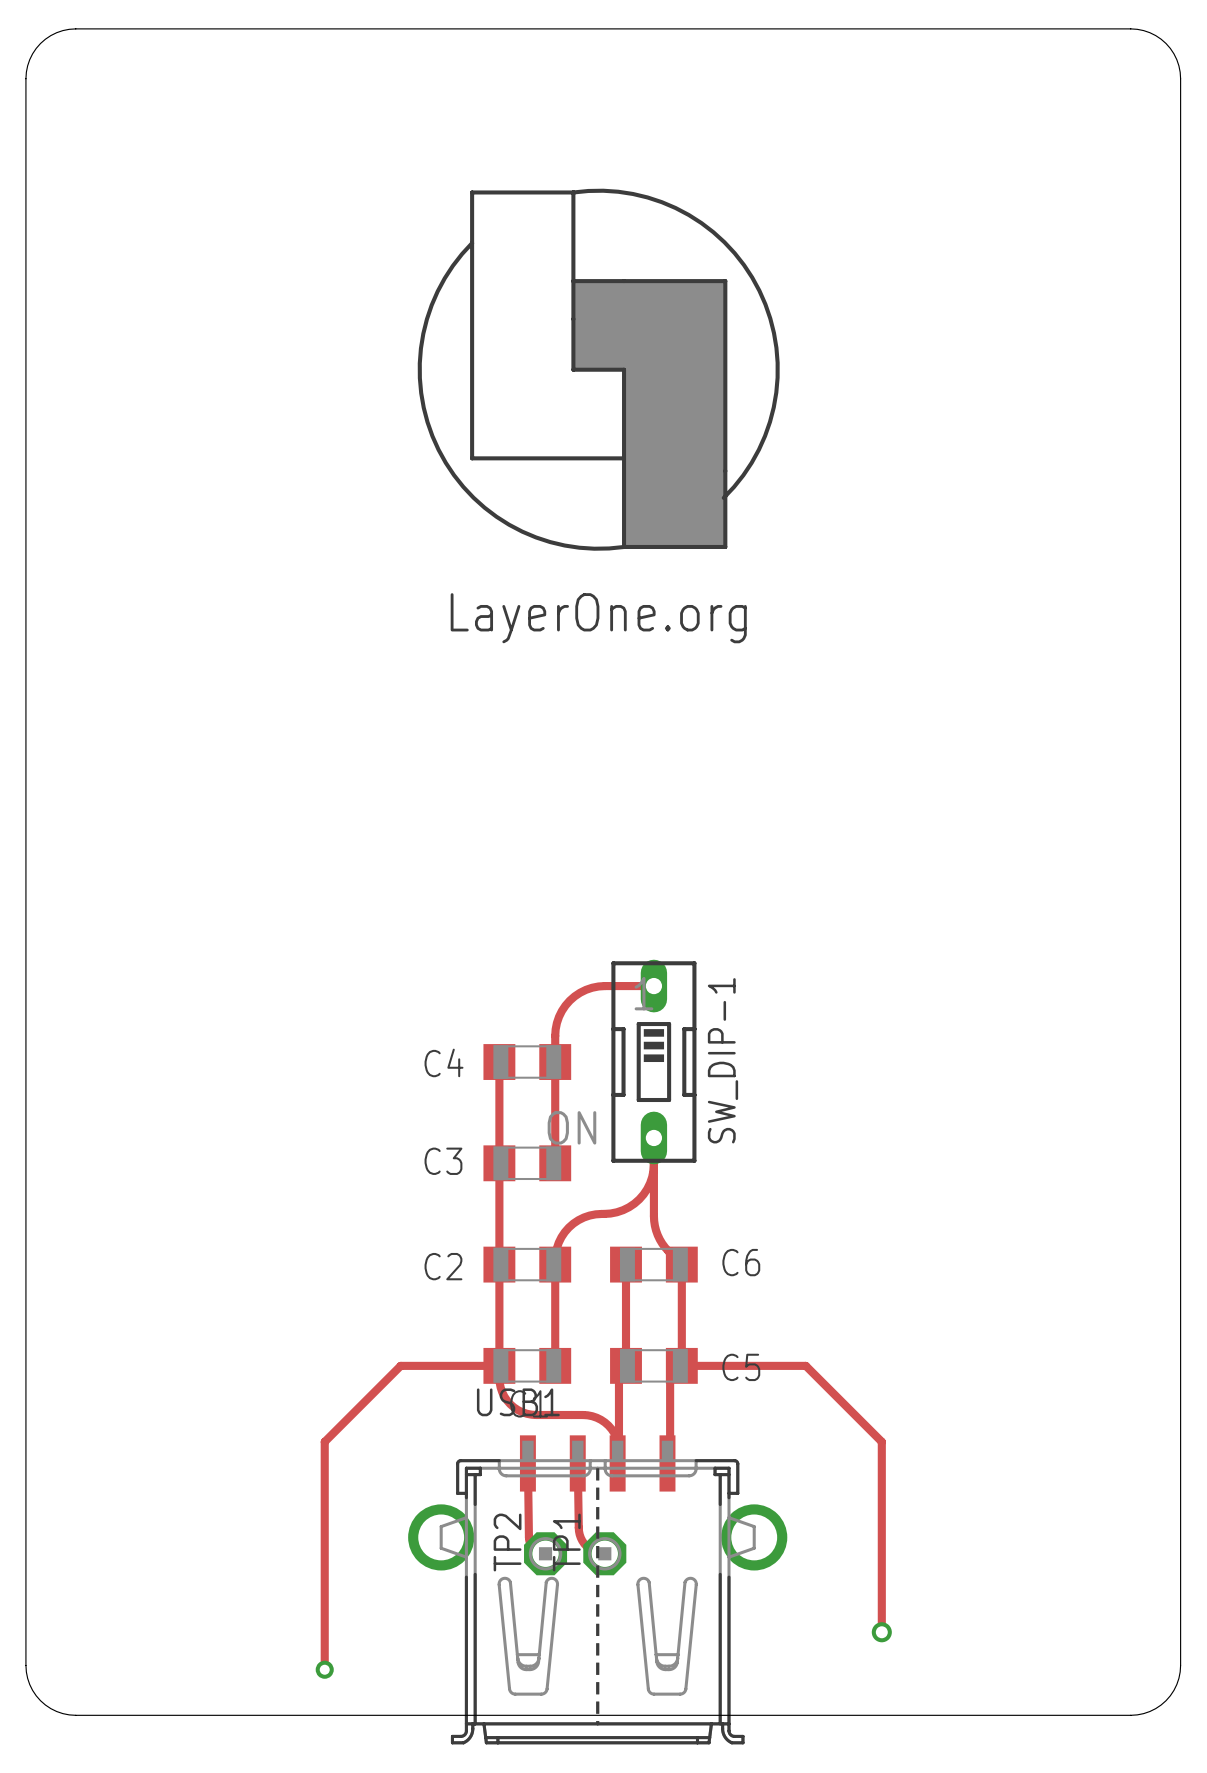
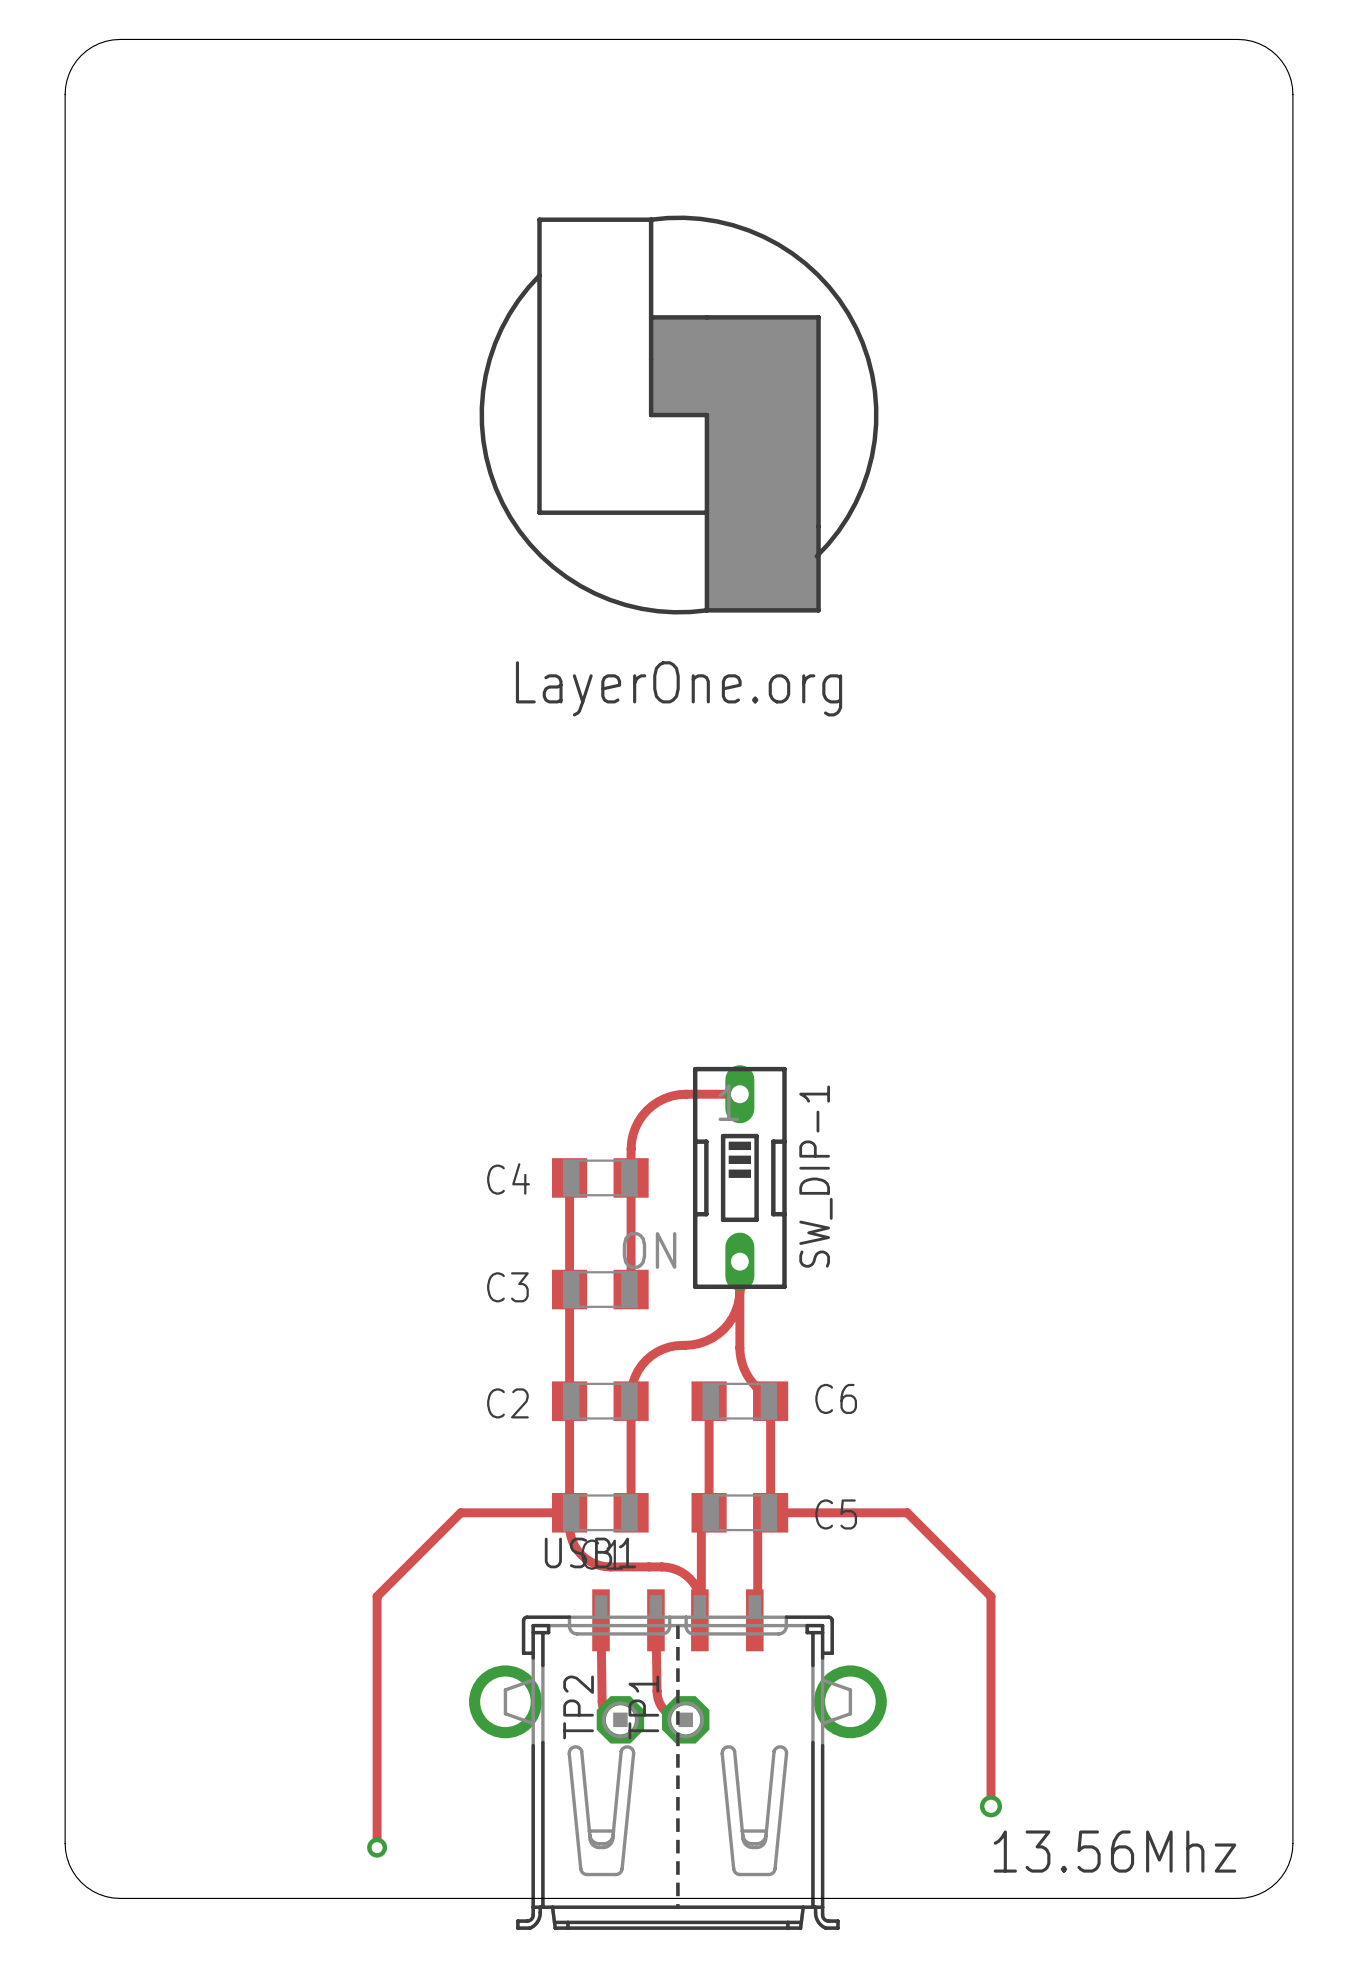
board edge: (91, 28) (62, 30) (45, 39) (32, 53) (27, 65) (25, 78) (25, 1665) (27, 1678) (32, 1690) (40, 1700) (50, 1708) (62, 1713) (75, 1715) (1130, 1715) (1149, 1711) (1166, 1700) (1176, 1684) (1180, 1665) (1180, 78) (1178, 65) (1173, 53) (1166, 43) (1155, 35) (1137, 29) (1105, 28) -> (120, 39) (99, 43) (81, 55) (69, 73) (65, 94) (65, 1843) (69, 1864) (81, 1882) (99, 1894) (120, 1898) (1237, 1898) (1252, 1896) (1265, 1891) (1276, 1882) (1285, 1870) (1291, 1857) (1292, 1843) (1292, 94) (1288, 73) (1276, 55) (1259, 43) (1237, 39)
text: none -> 13.56Mhz (1114, 1851)

